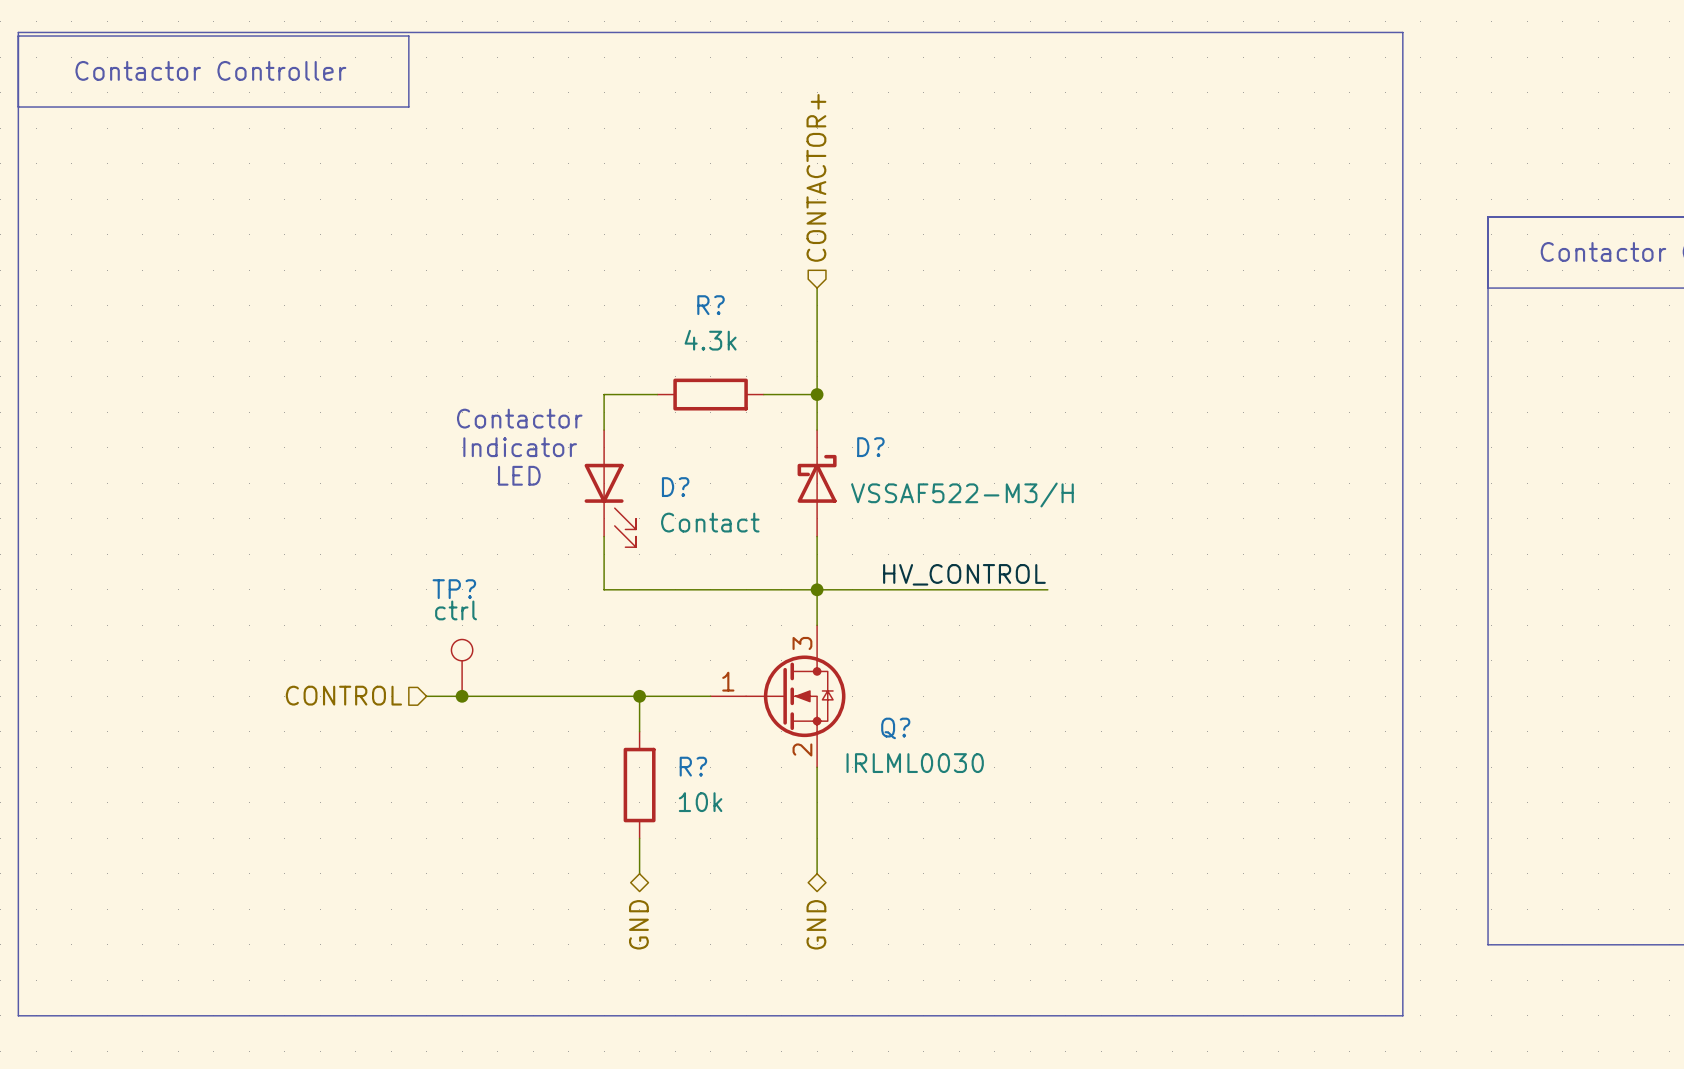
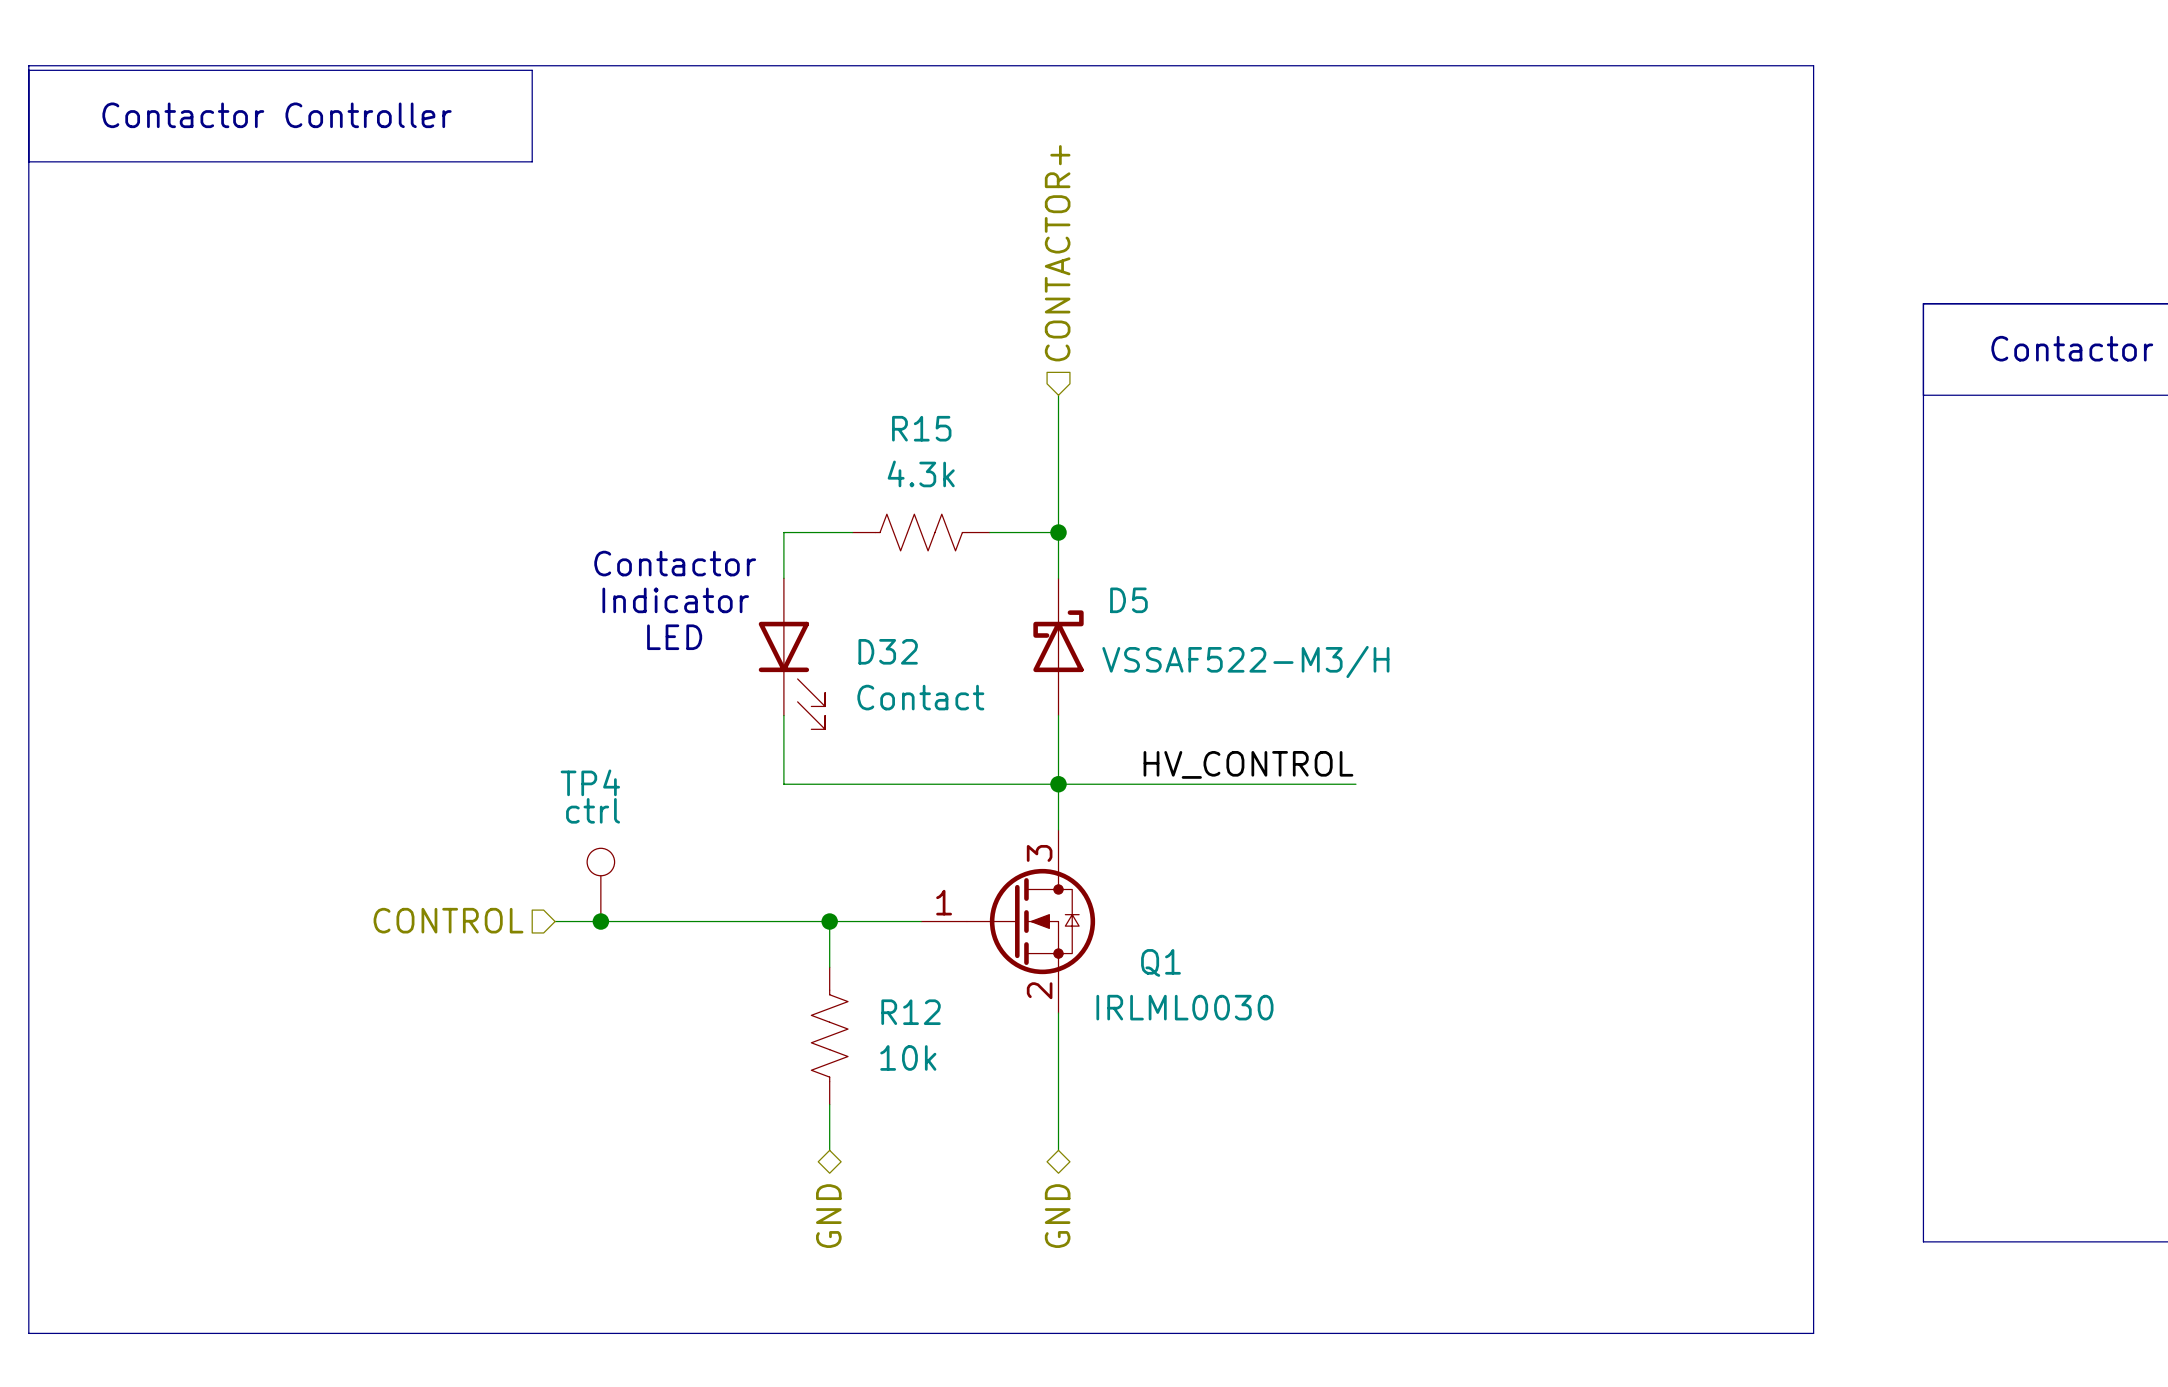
R?: 4.3k (710, 394) -> none
R15: none -> 4.3k (921, 532)
D? name: D? (870, 447) -> D5 (1128, 600)
D? name: D? (675, 487) -> D32 (888, 651)
TP? name: TP? (454, 589) -> TP4 (590, 782)
Q? name: Q? (895, 728) -> Q1 (1160, 962)
R?: 10k (639, 785) -> none
R12: none -> 10k (829, 1035)

